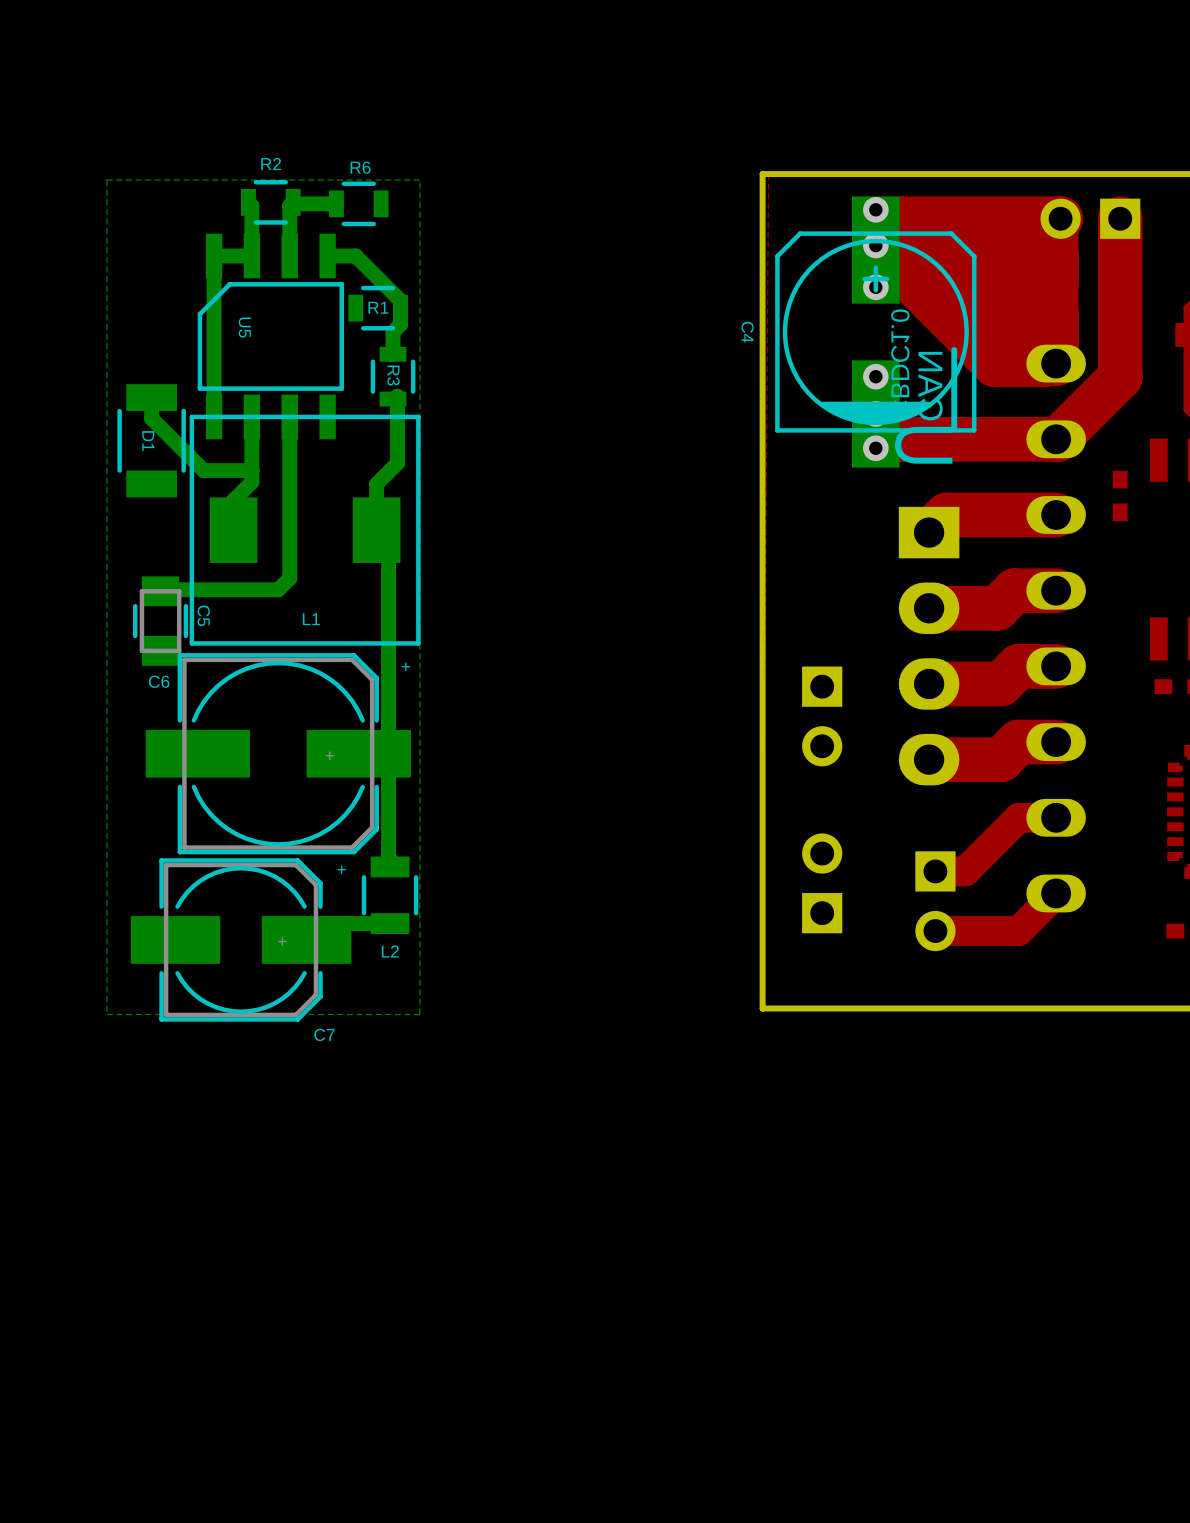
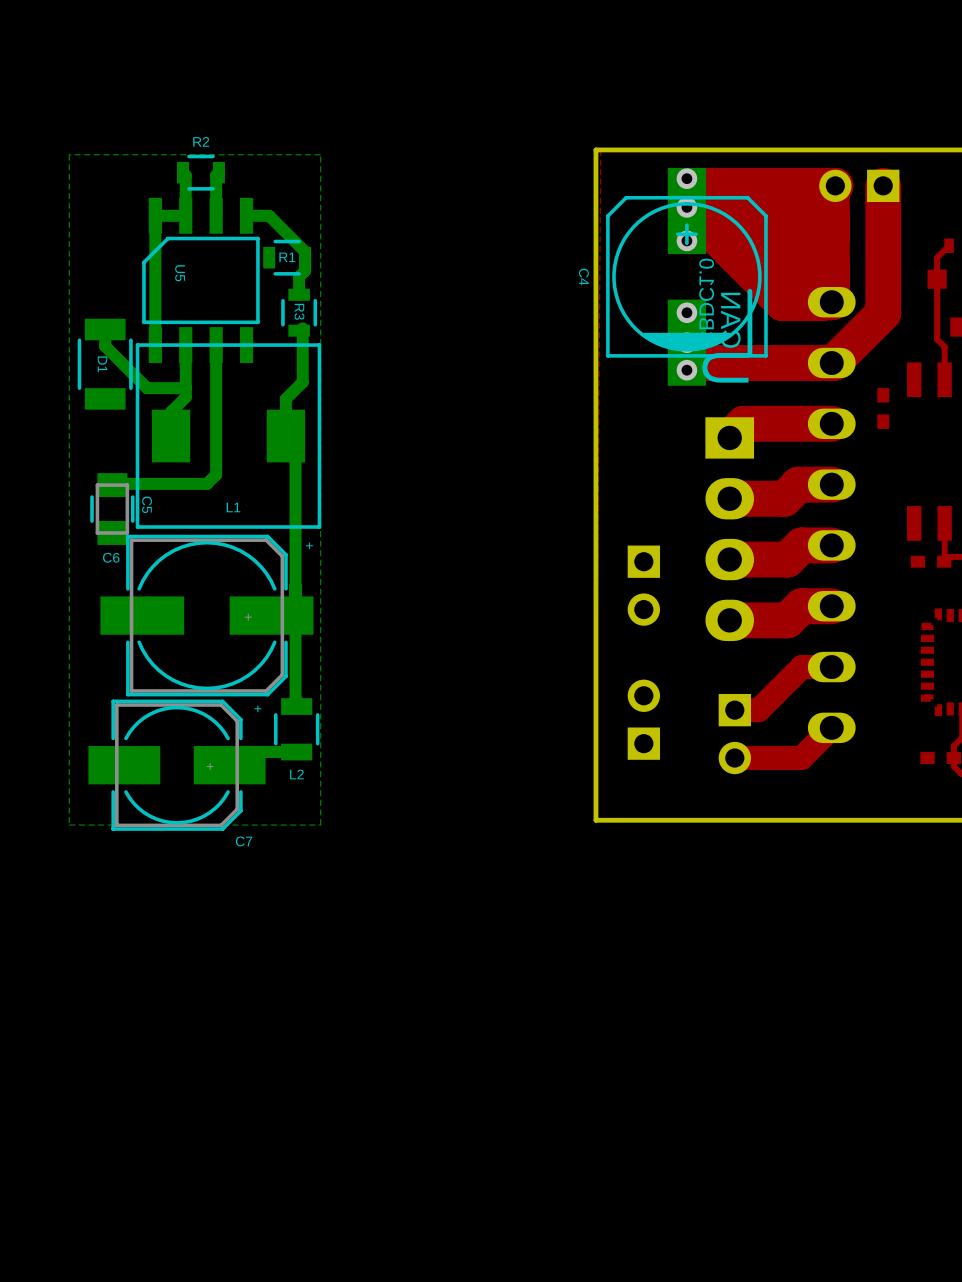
bottom track: (293, 202) (336, 203) -> none
R6: (358, 203) -> none

